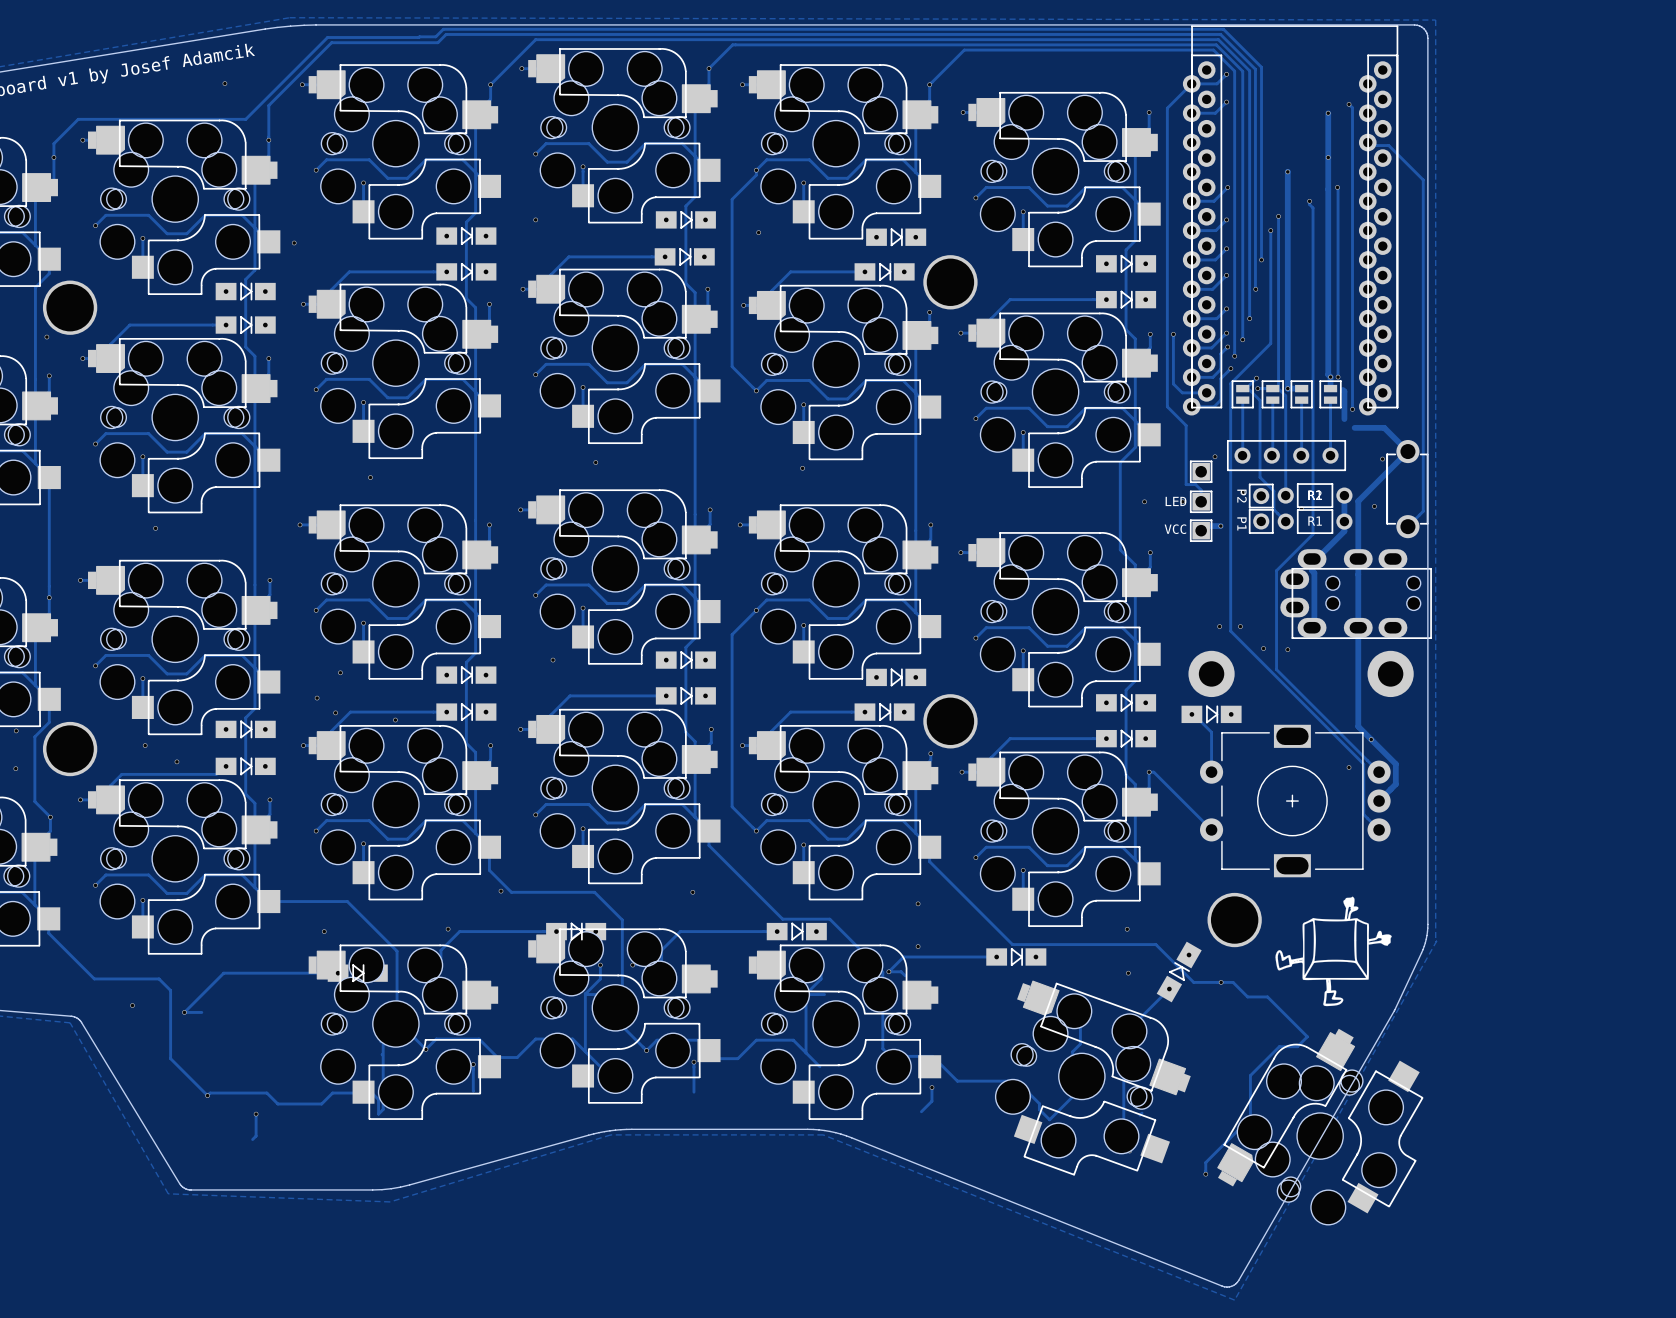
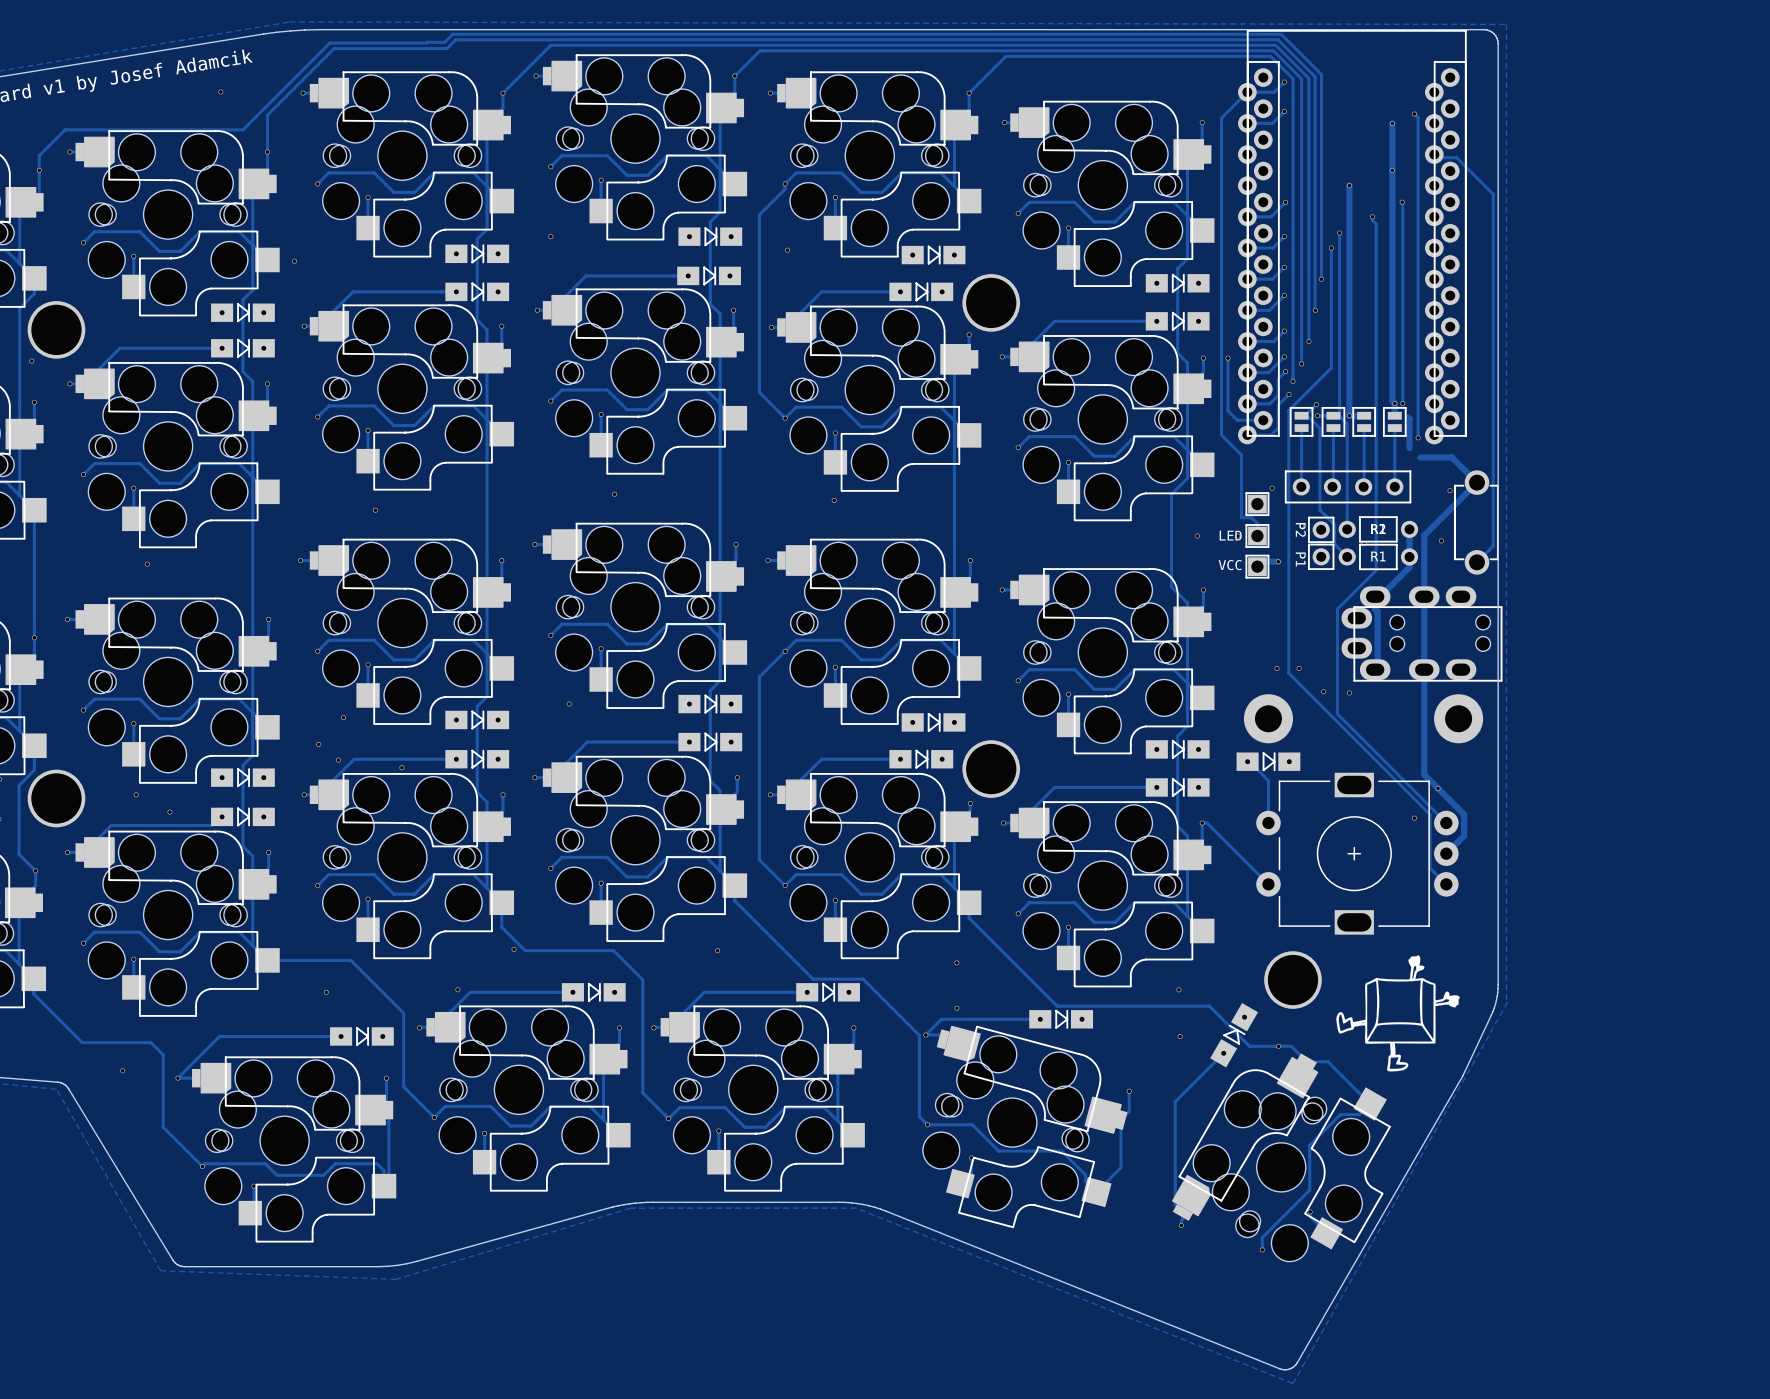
part: (624, 1016) -> none
part: none -> (528, 1098)
part: none -> (762, 1098)
part: (404, 1032) -> none
part: (845, 1032) -> none
part: none -> (1025, 1126)
part: (1093, 1078) -> none
part: none -> (294, 1149)
part position: (1320, 1126) -> (1281, 1157)

